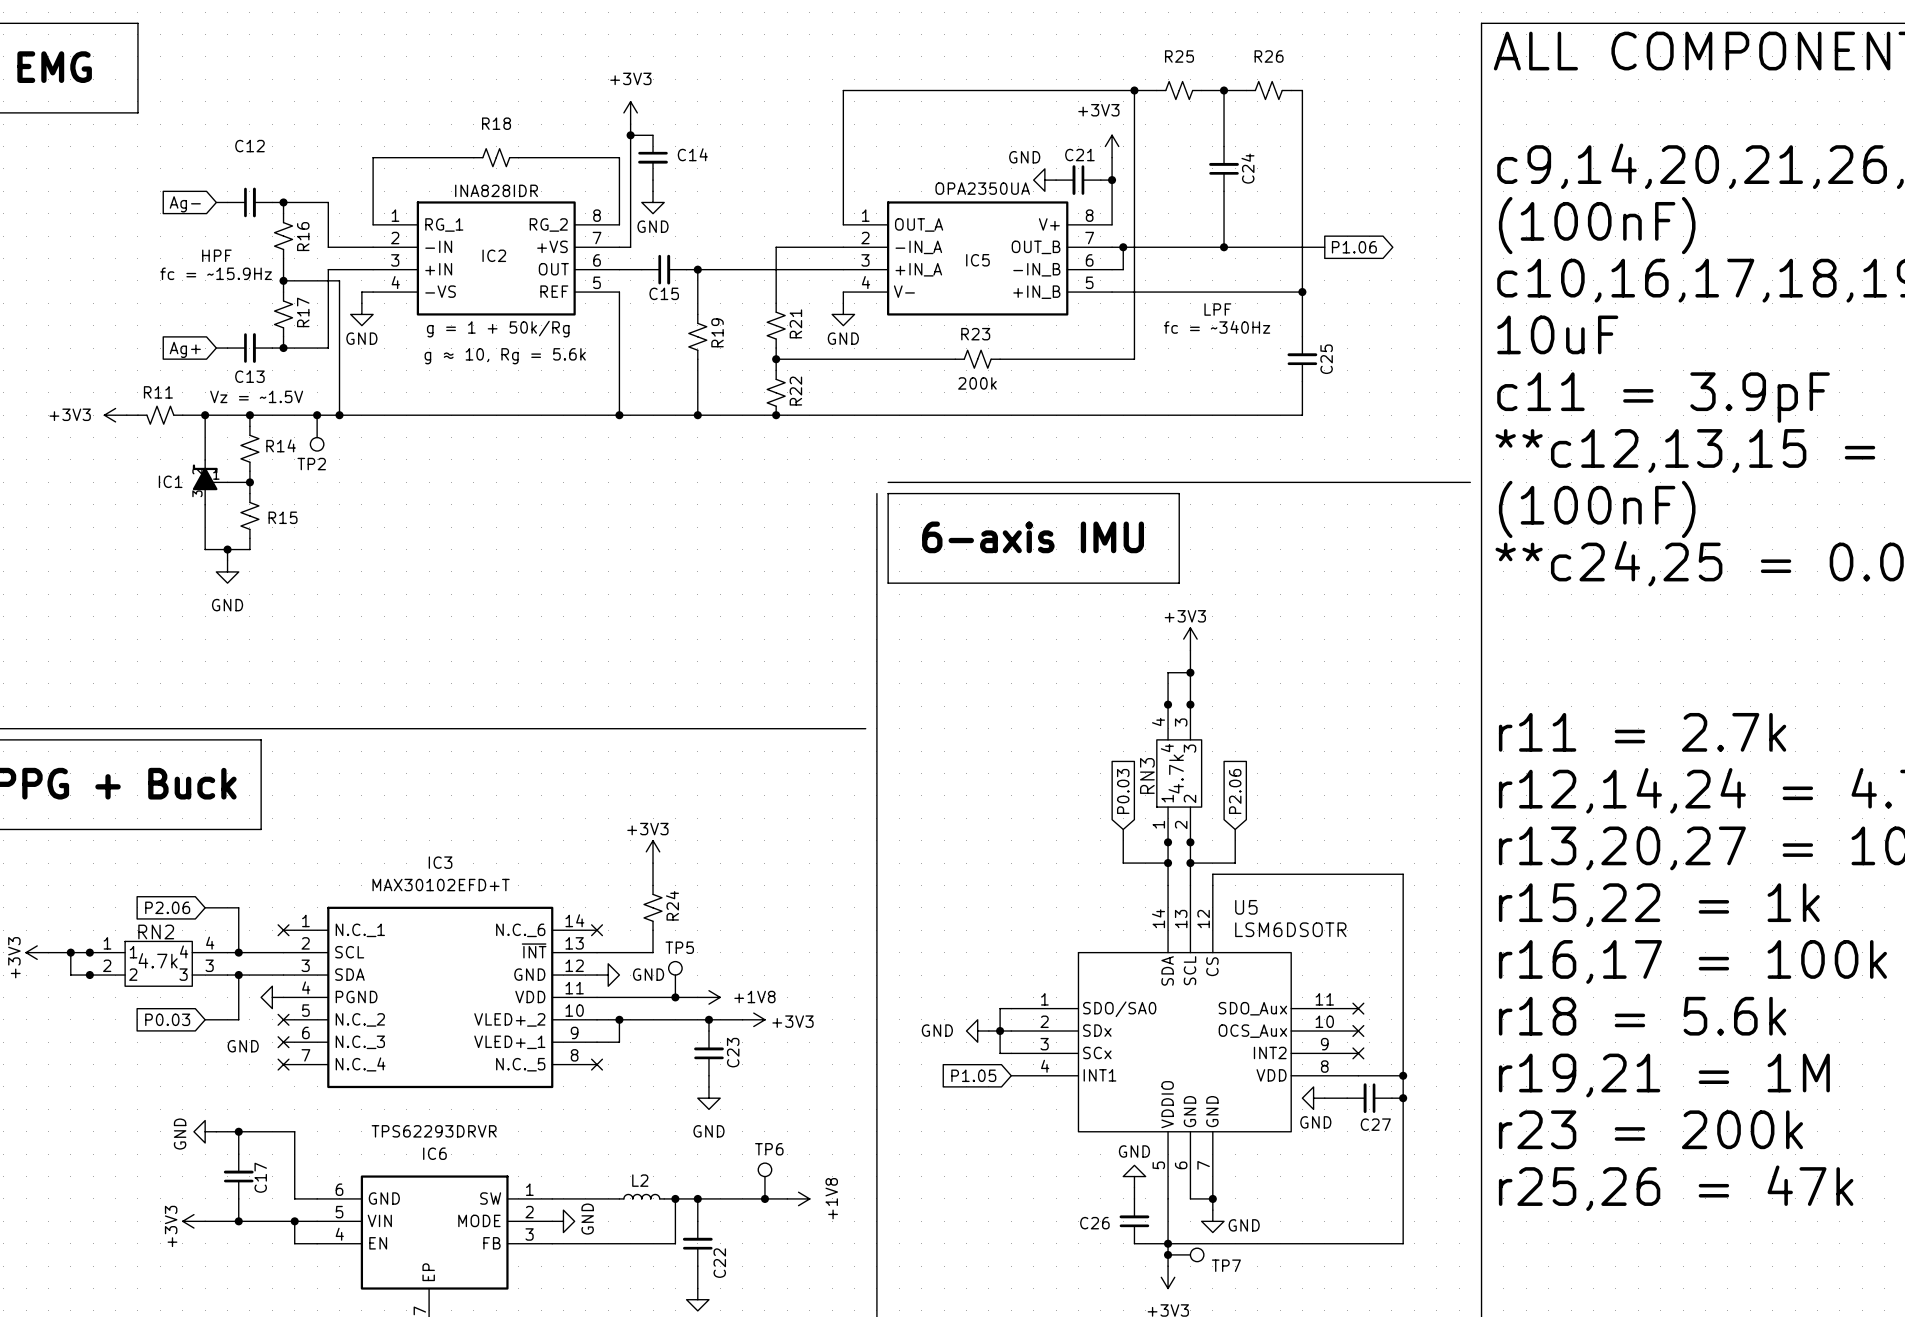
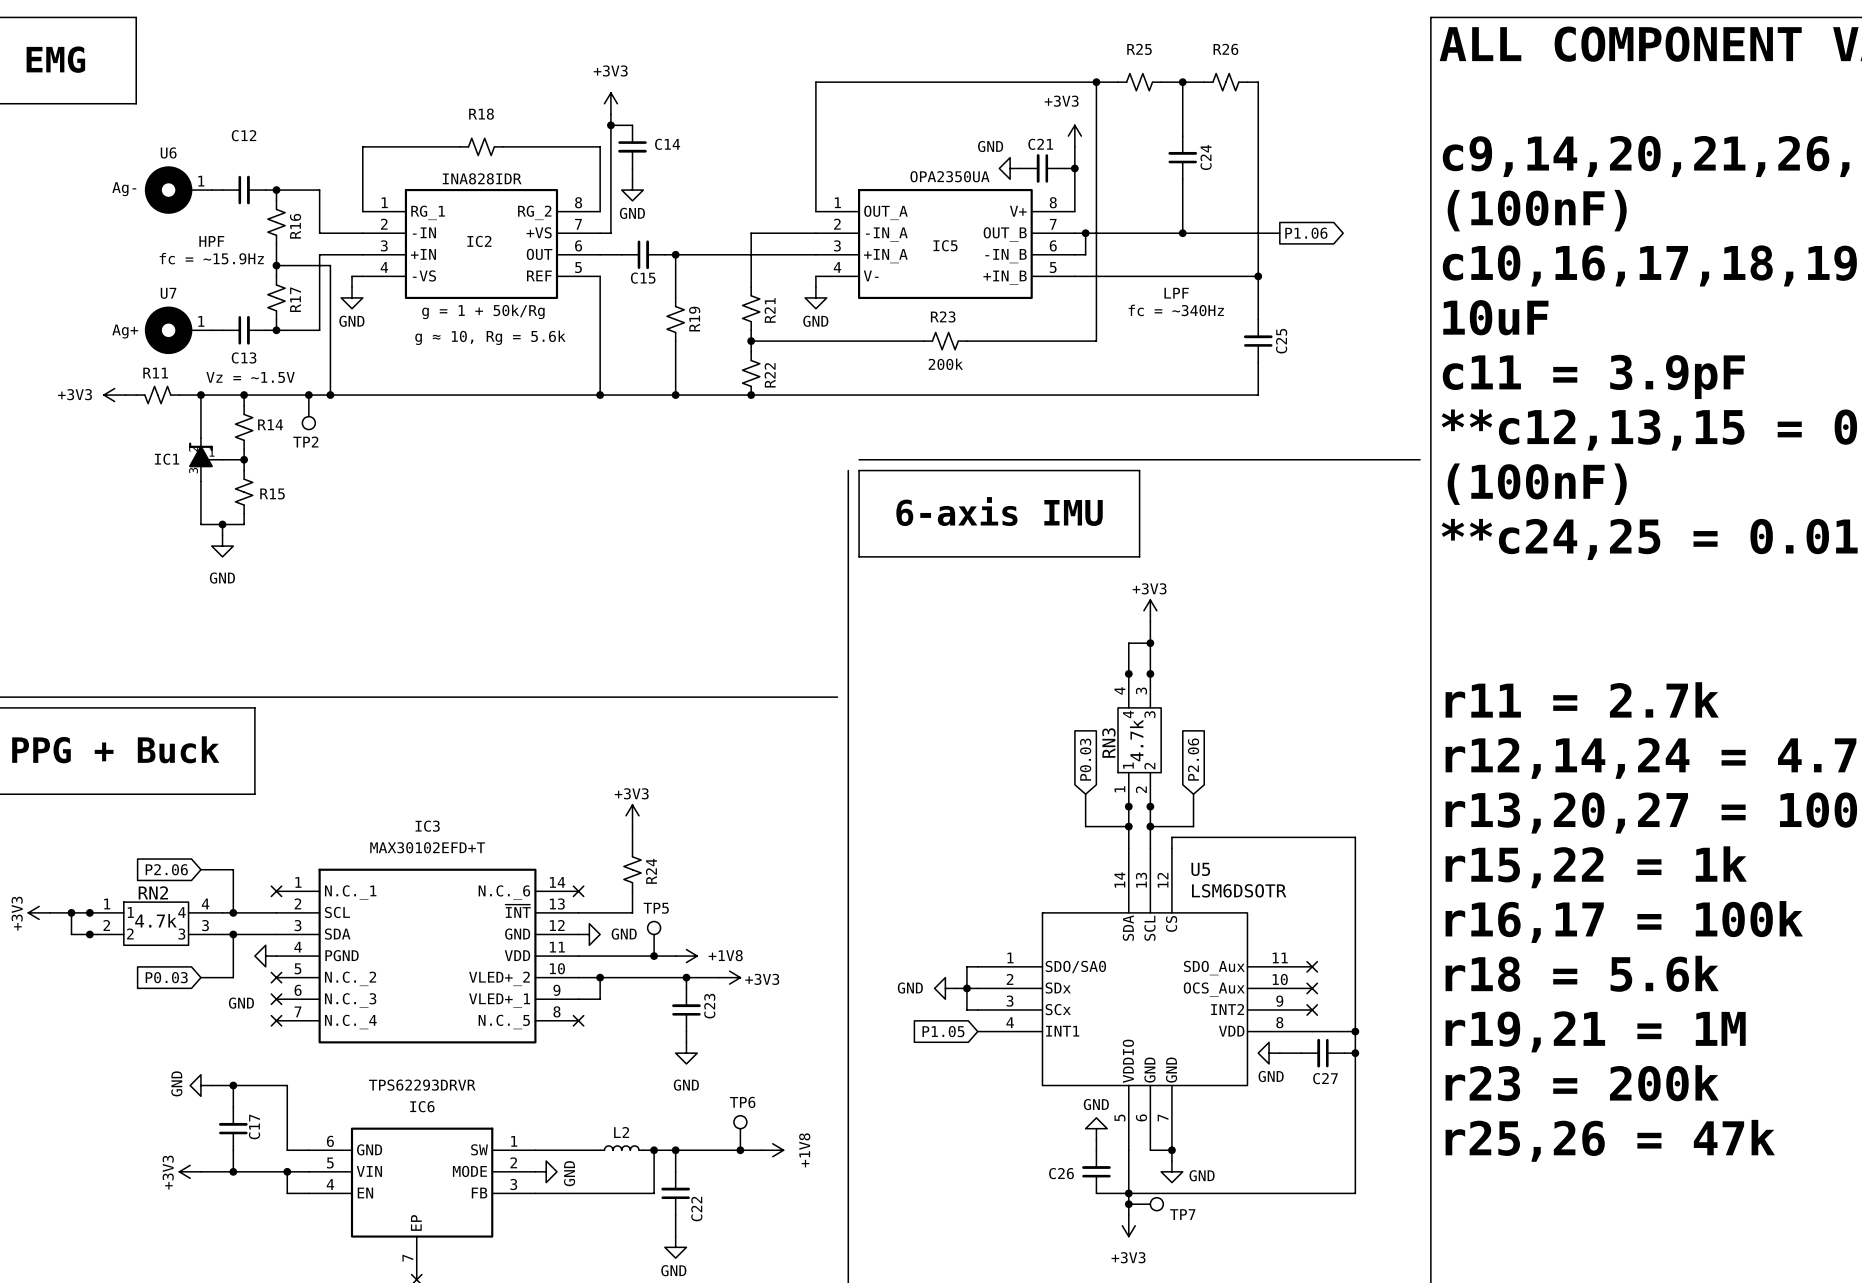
text: none -> Ag- (124, 189)
U6: none -> (178, 190)
global label: Ag- (185, 204) -> none
U7: none -> (178, 330)
text: none -> Ag+ (125, 331)
global label: Ag+ (185, 349) -> none

